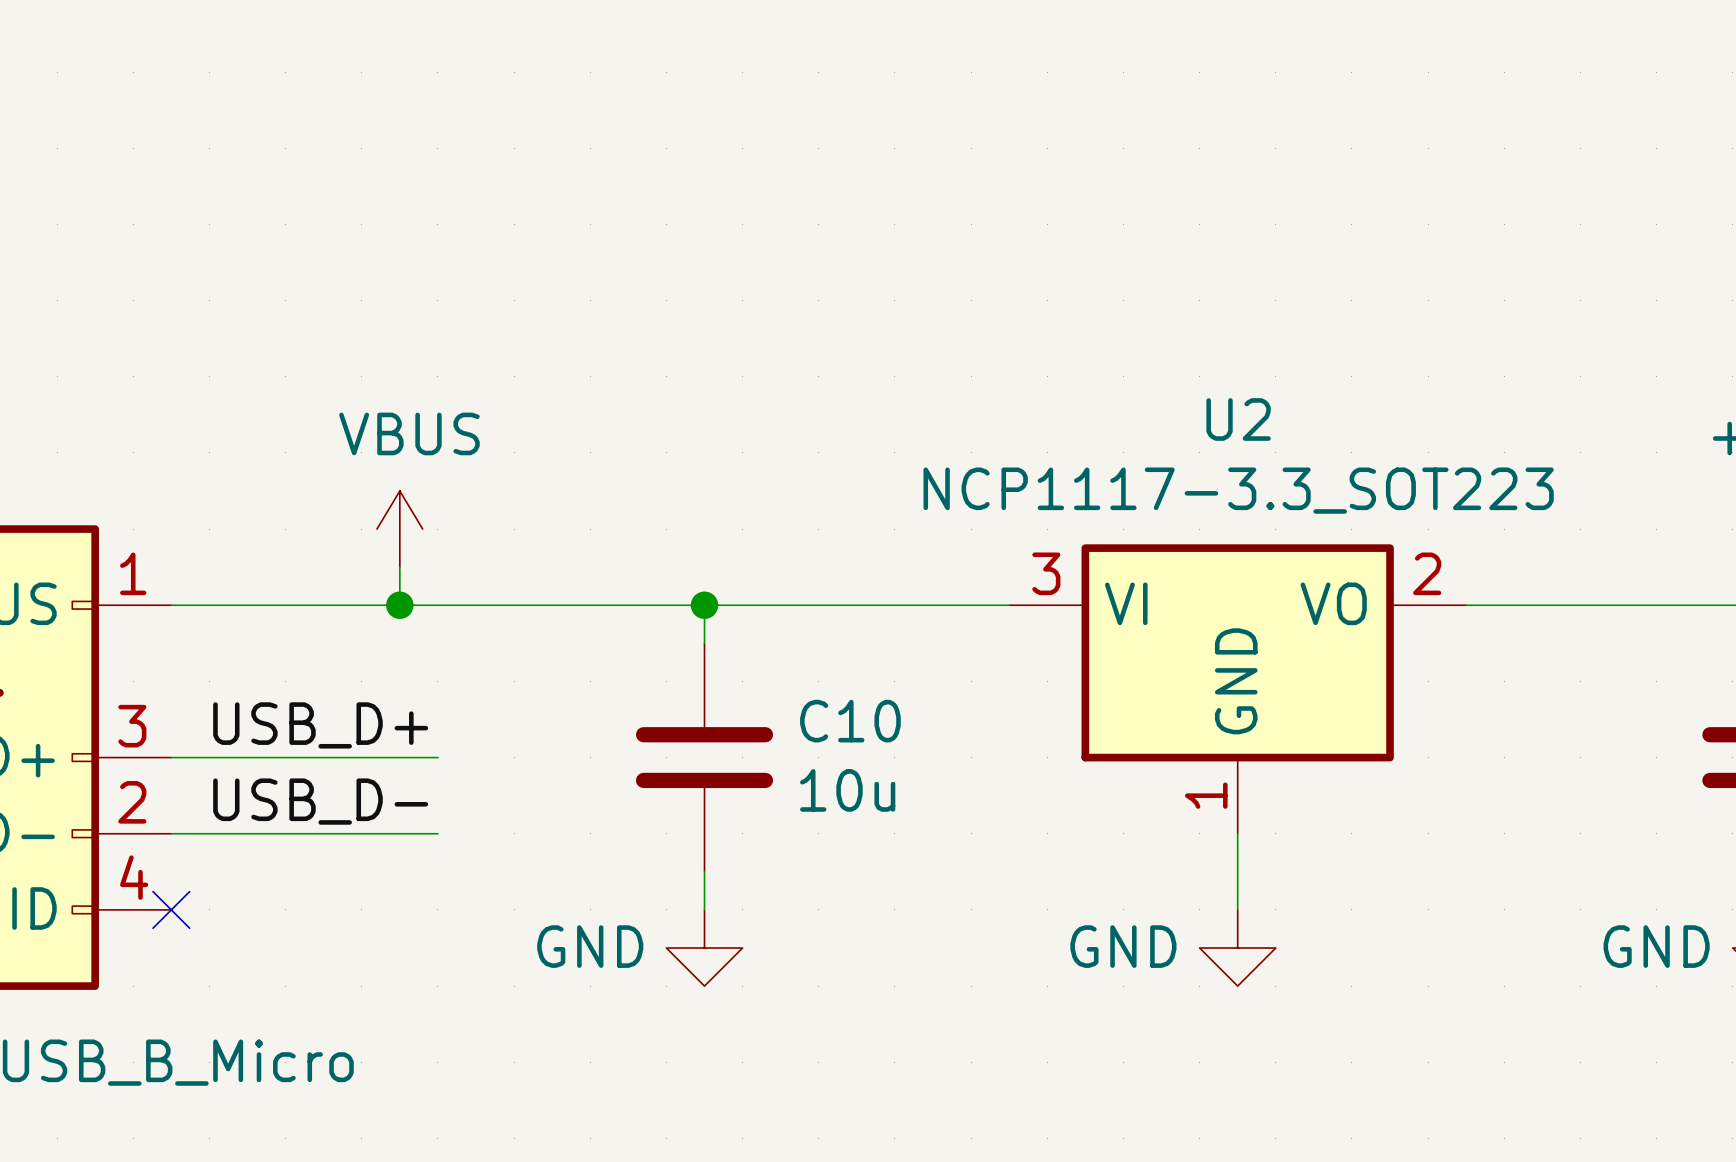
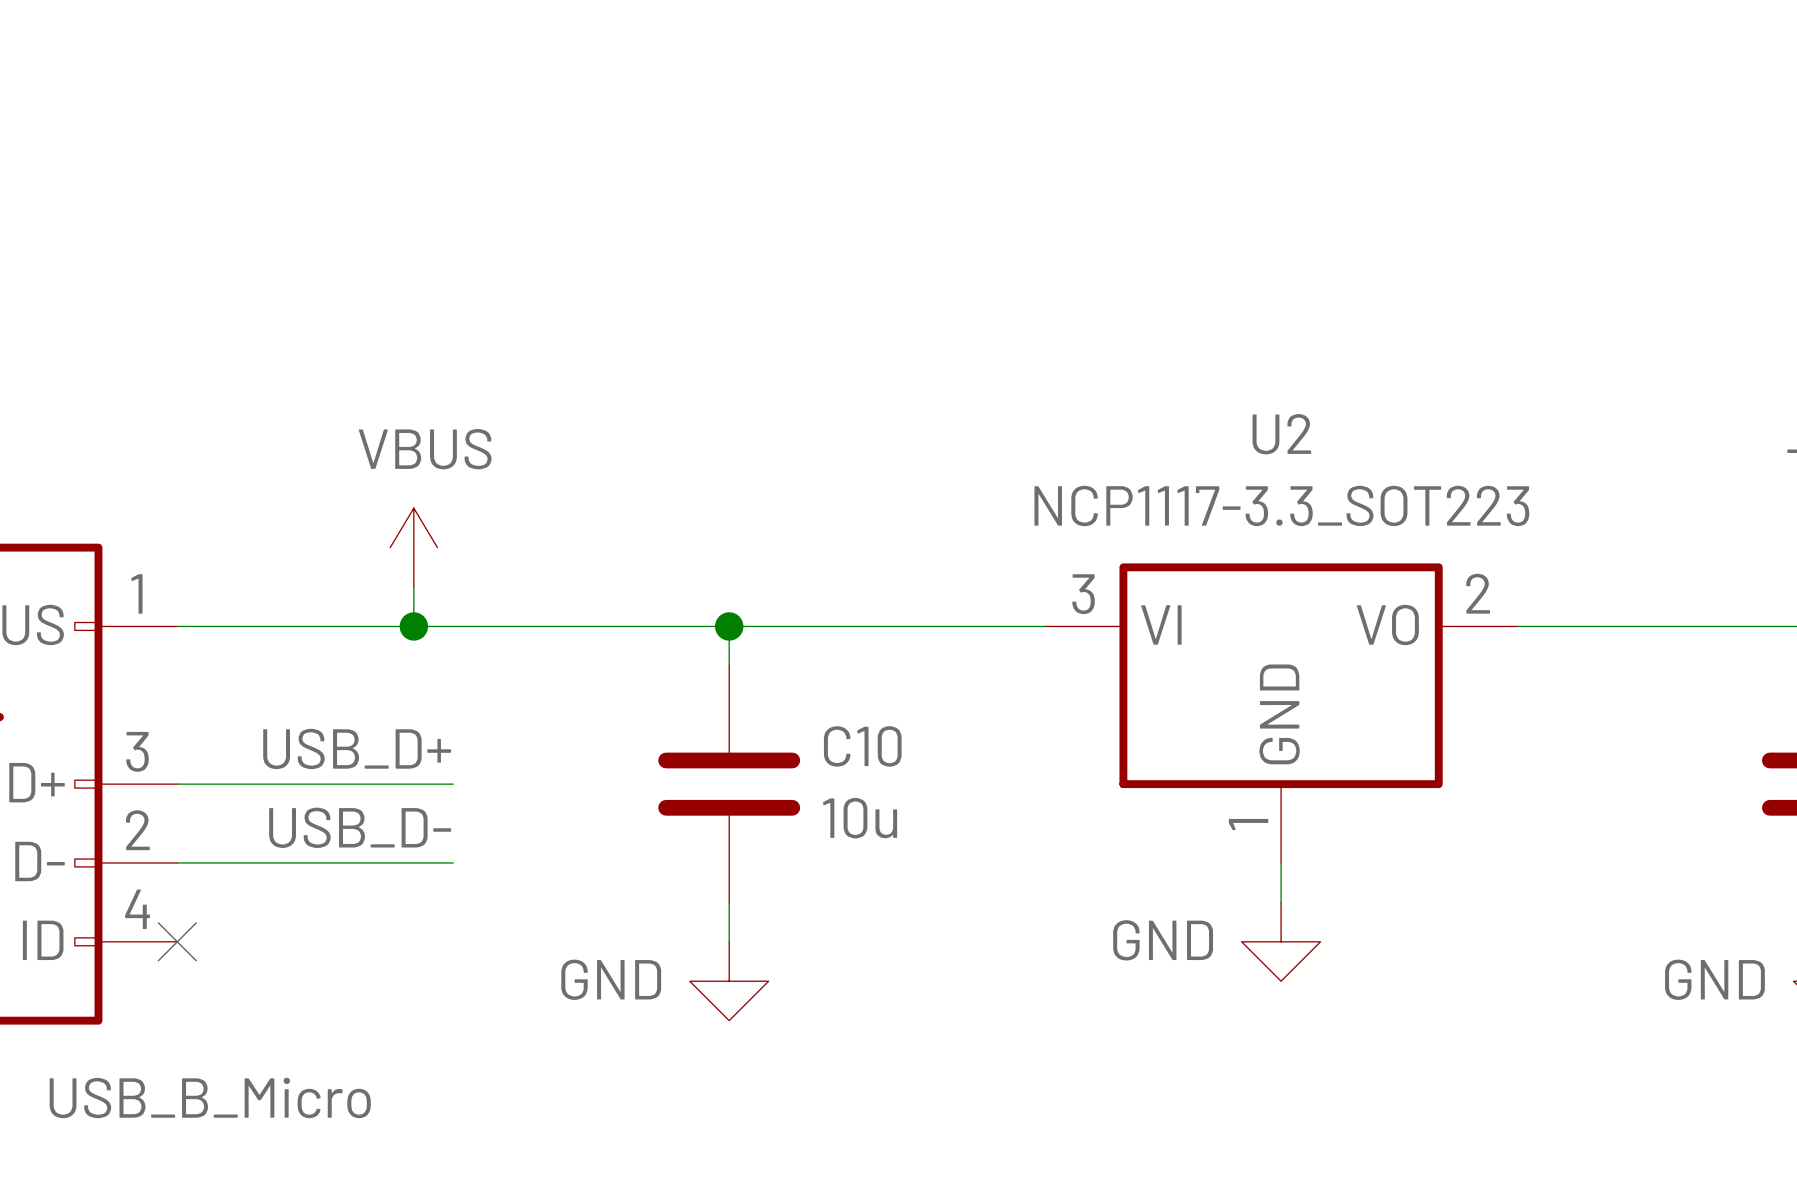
power symbol position: GND (1237, 948) -> GND (1281, 941)

